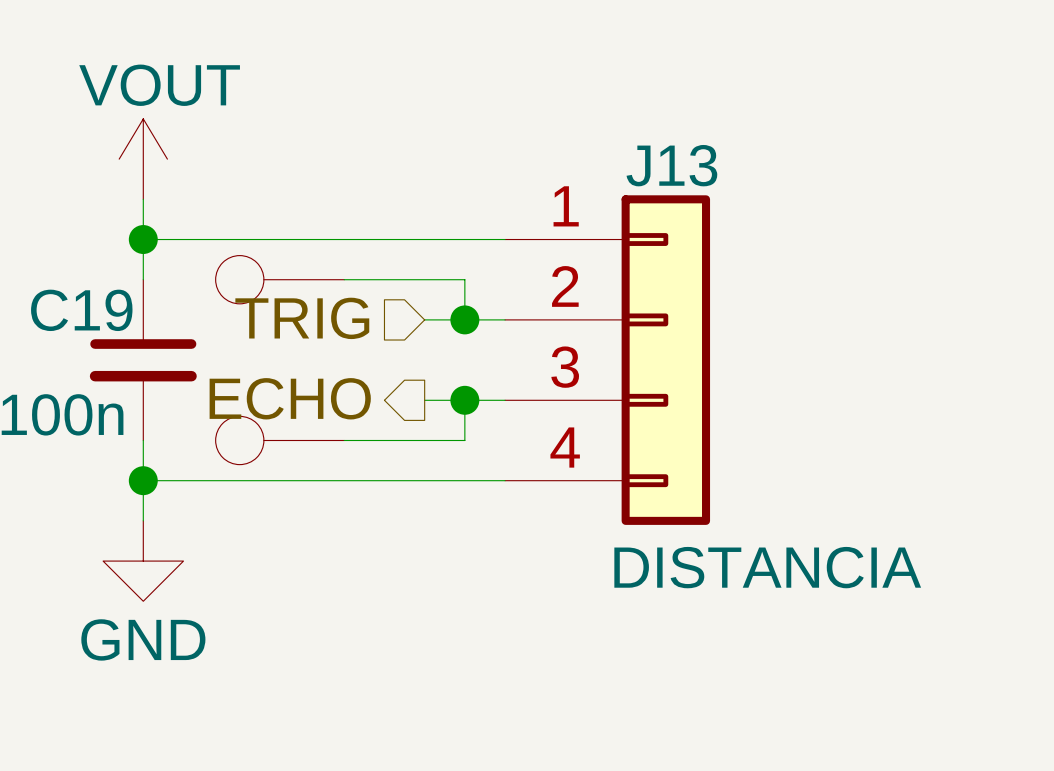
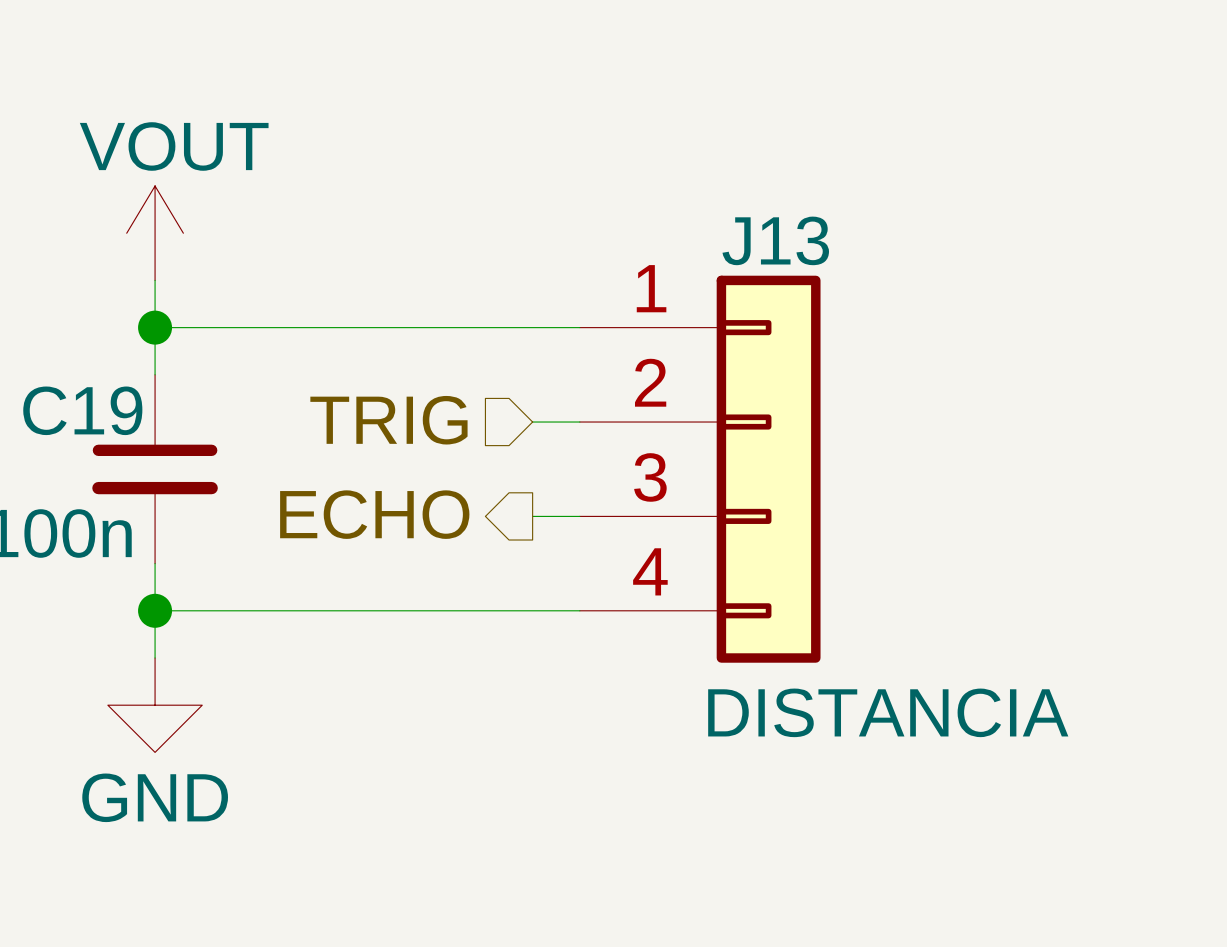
part: (279, 279) -> none
wire: (344, 279) (464, 279) (464, 319) (424, 319) -> none
hierarchical label position: TRIG (302, 318) -> TRIG (388, 420)
junction: (464, 319) -> none
hierarchical label position: ECHO (290, 398) -> ECHO (374, 514)
wire: (424, 400) (464, 400) (464, 440) (344, 440) -> none
junction: (464, 400) -> none
part: (279, 440) -> none

